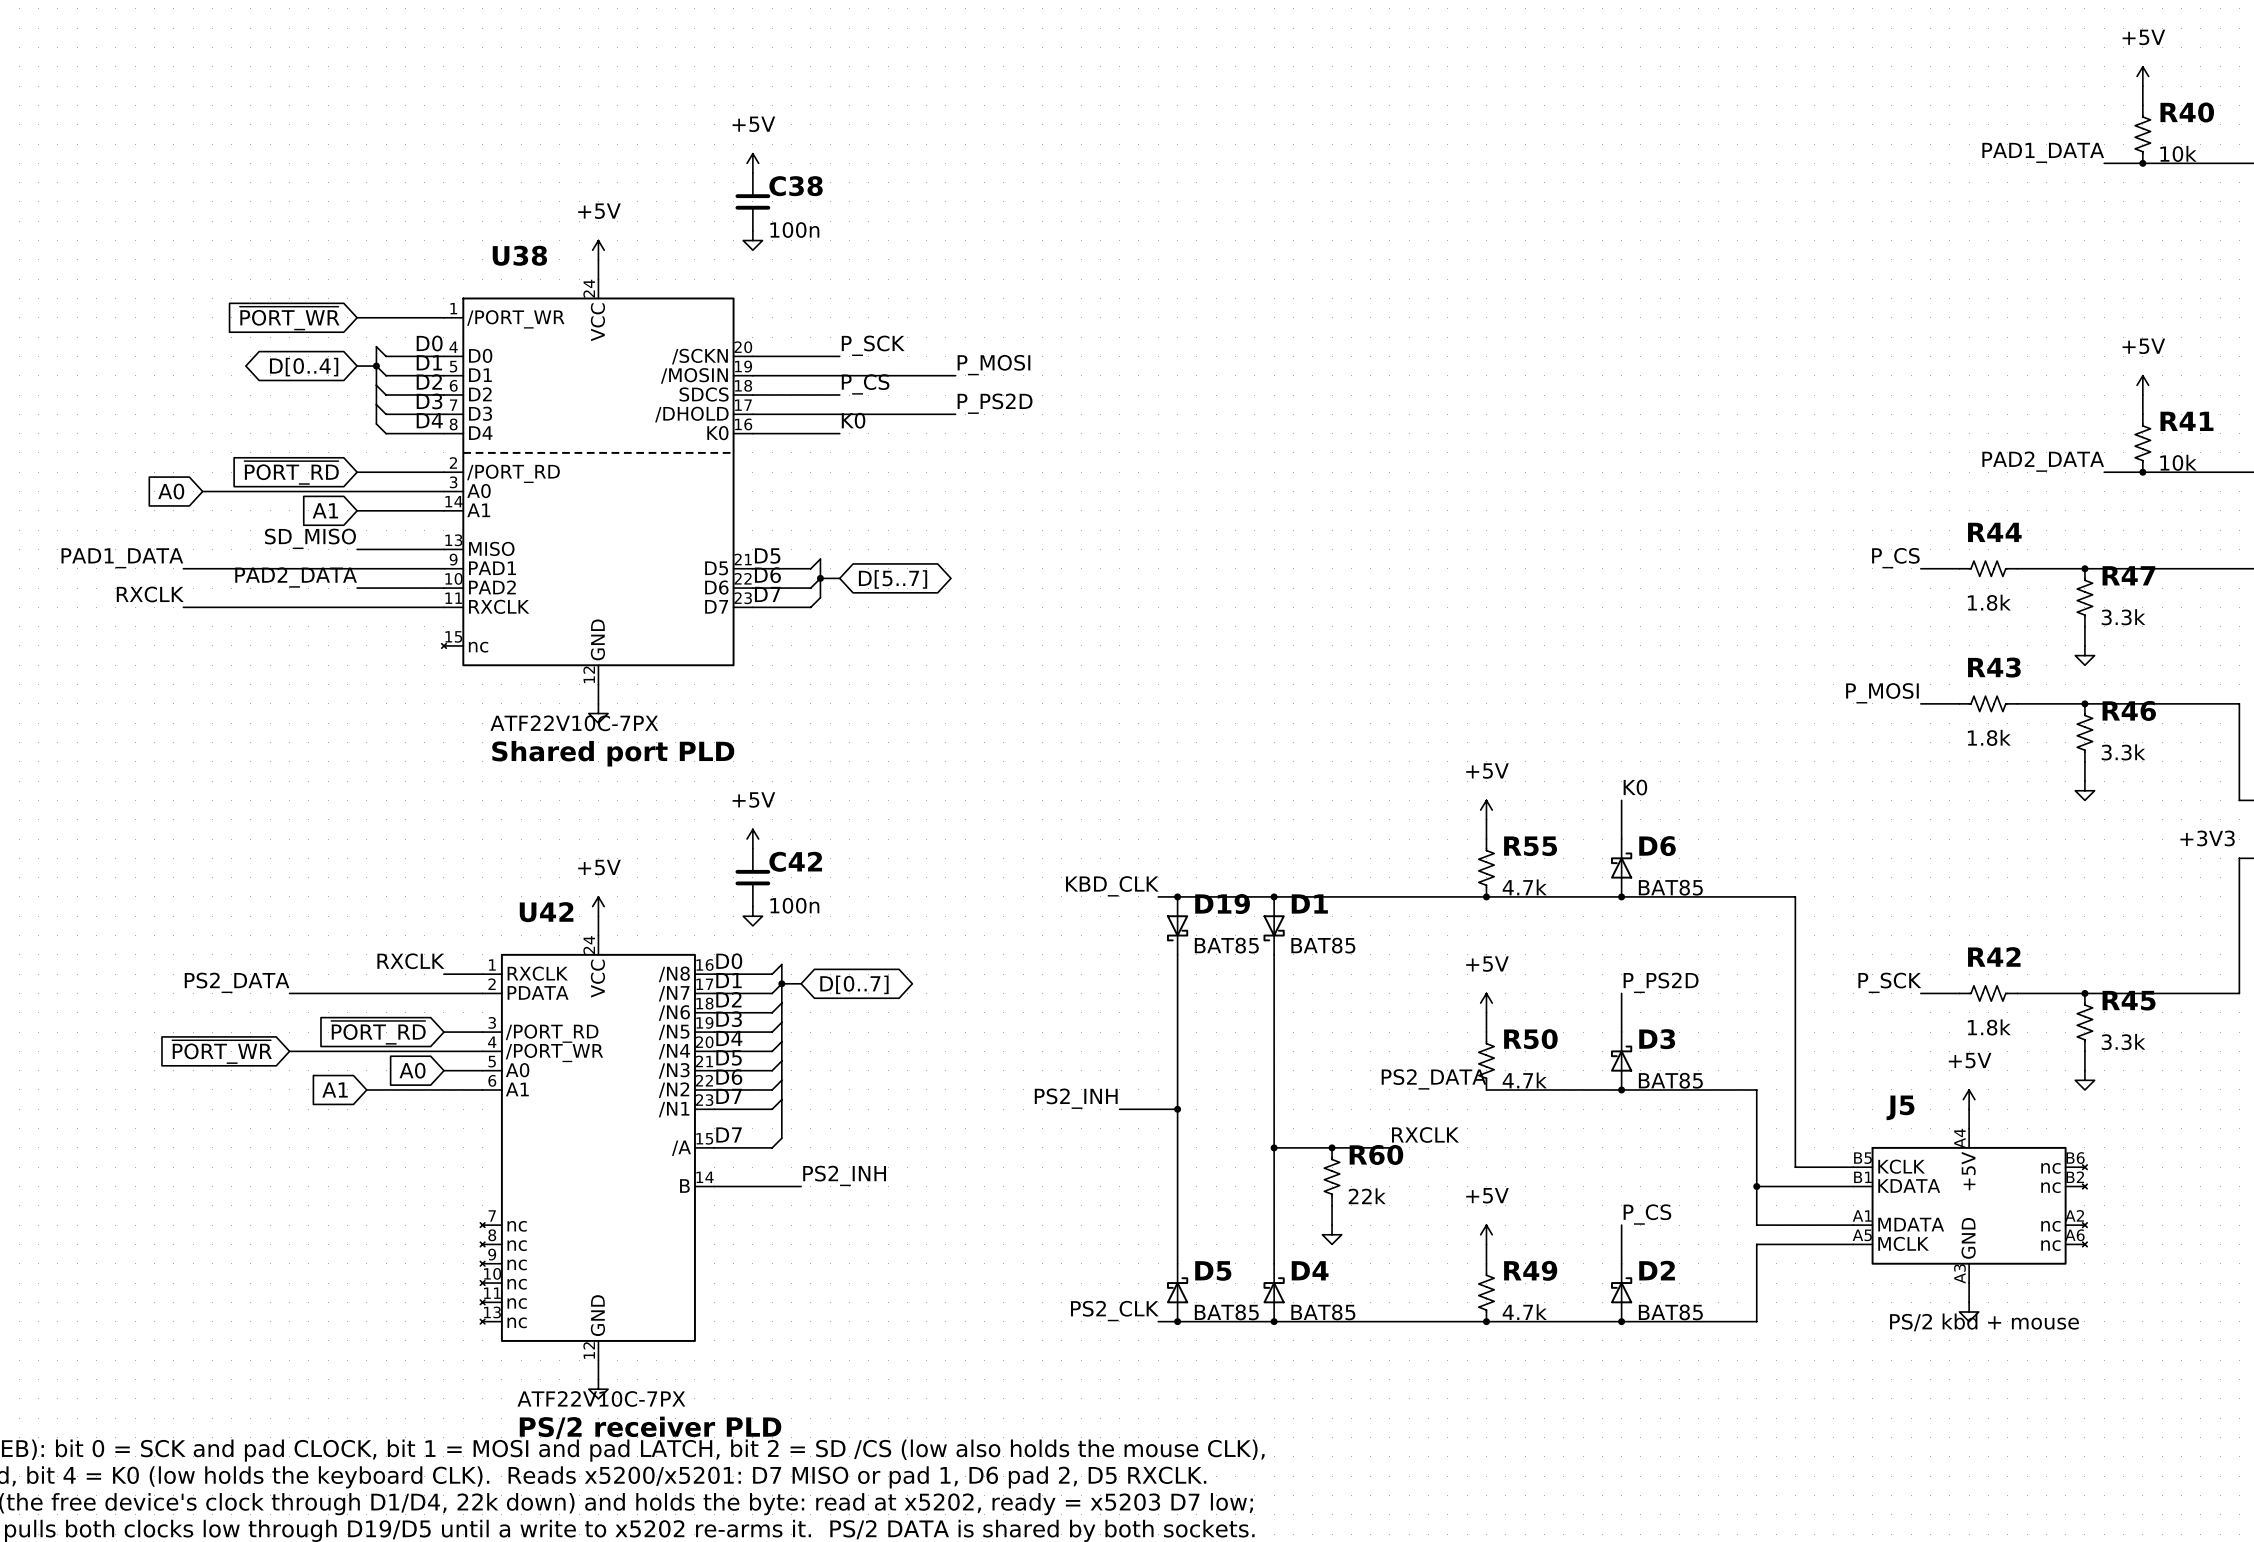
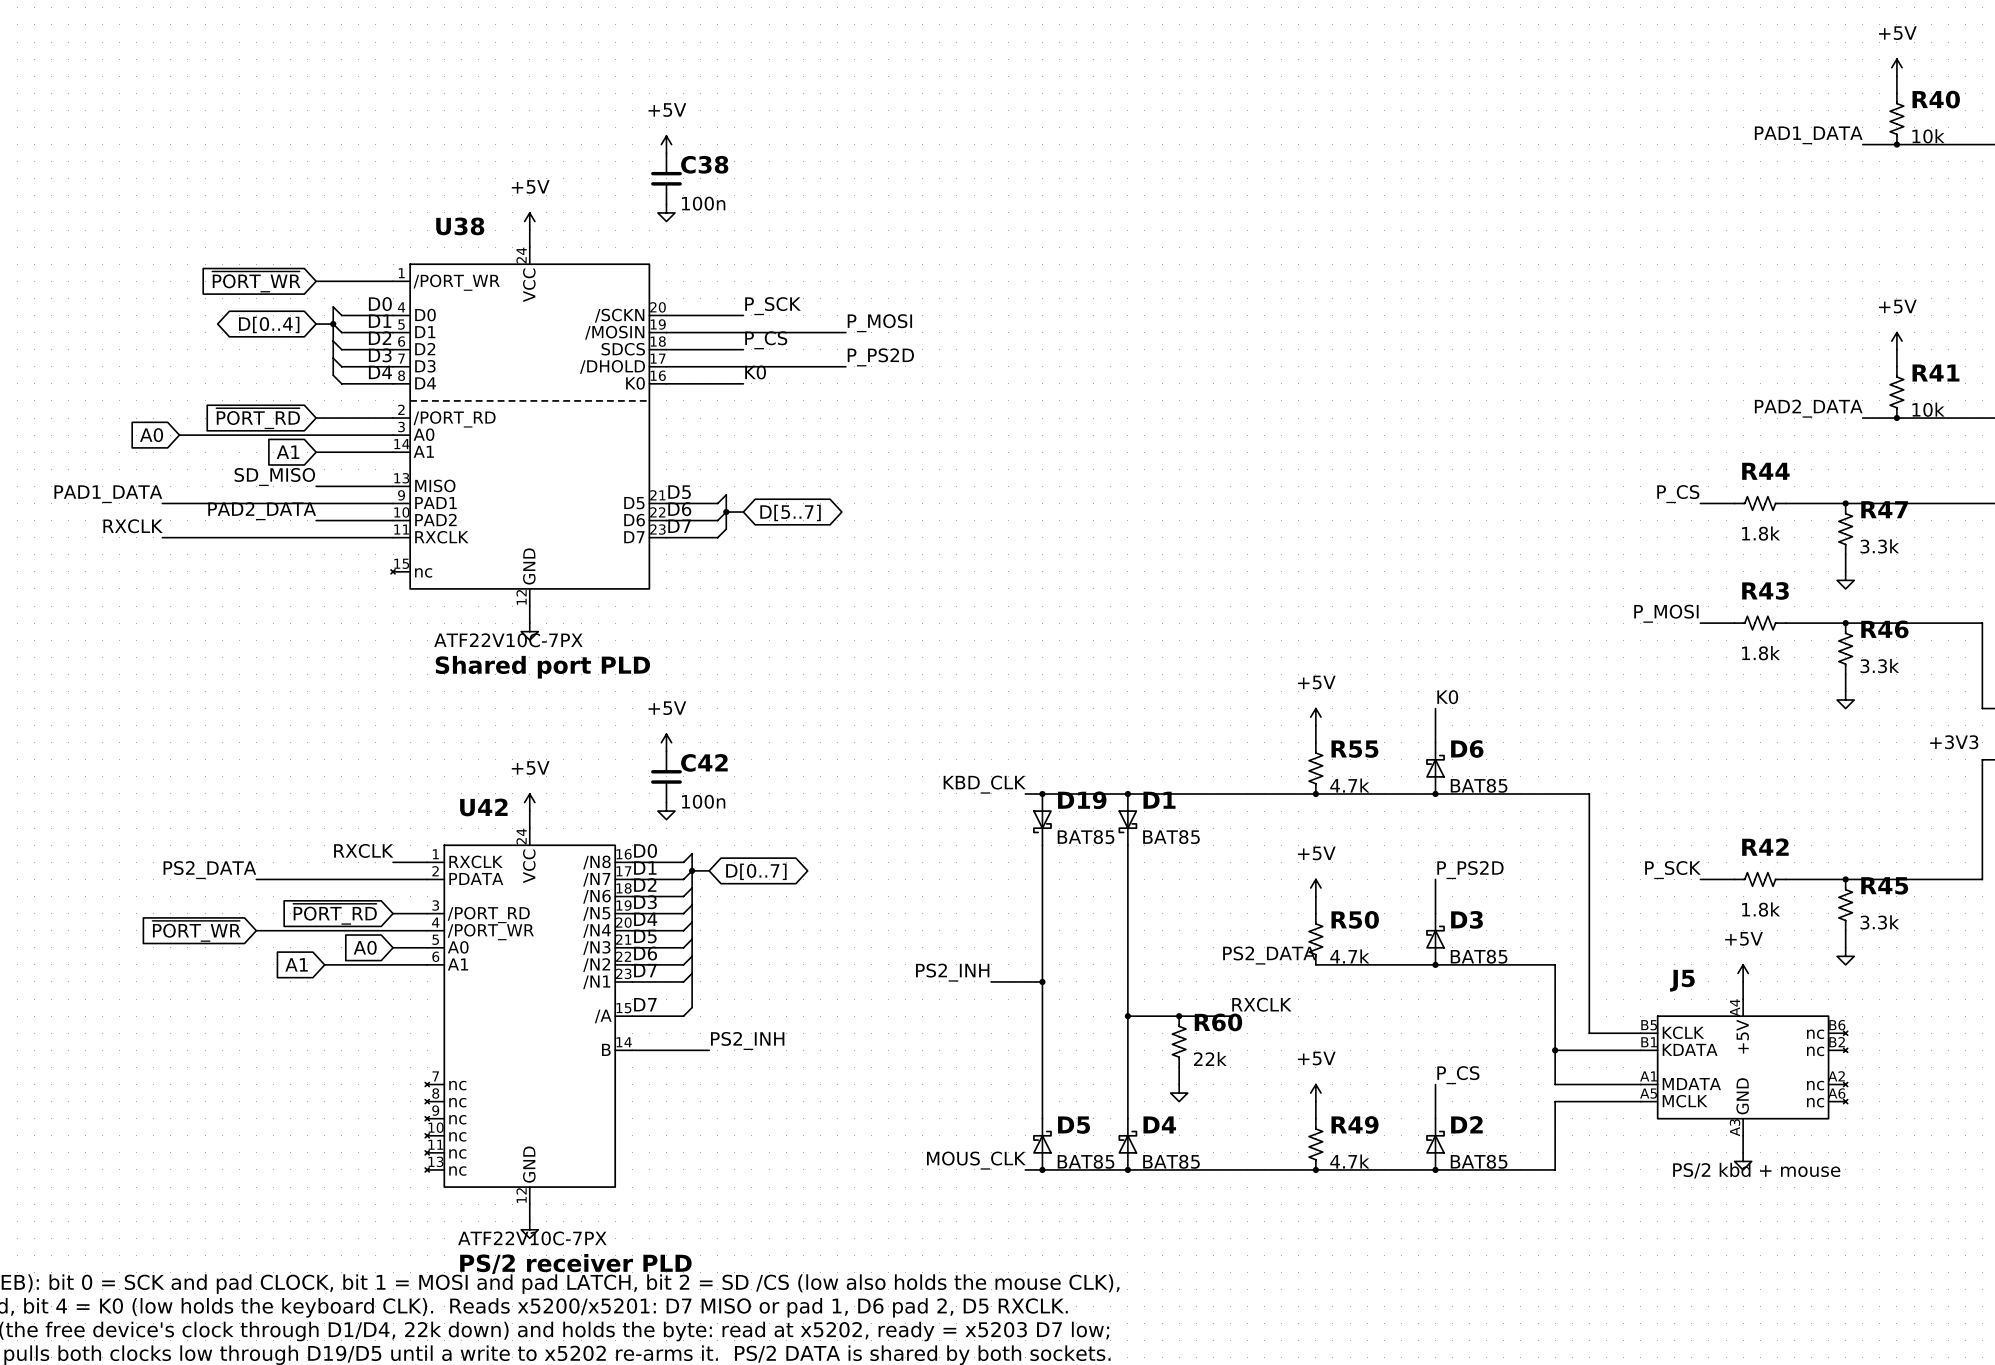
label: PS2_CLK (1114, 1311) -> MOUS_CLK (976, 1160)

